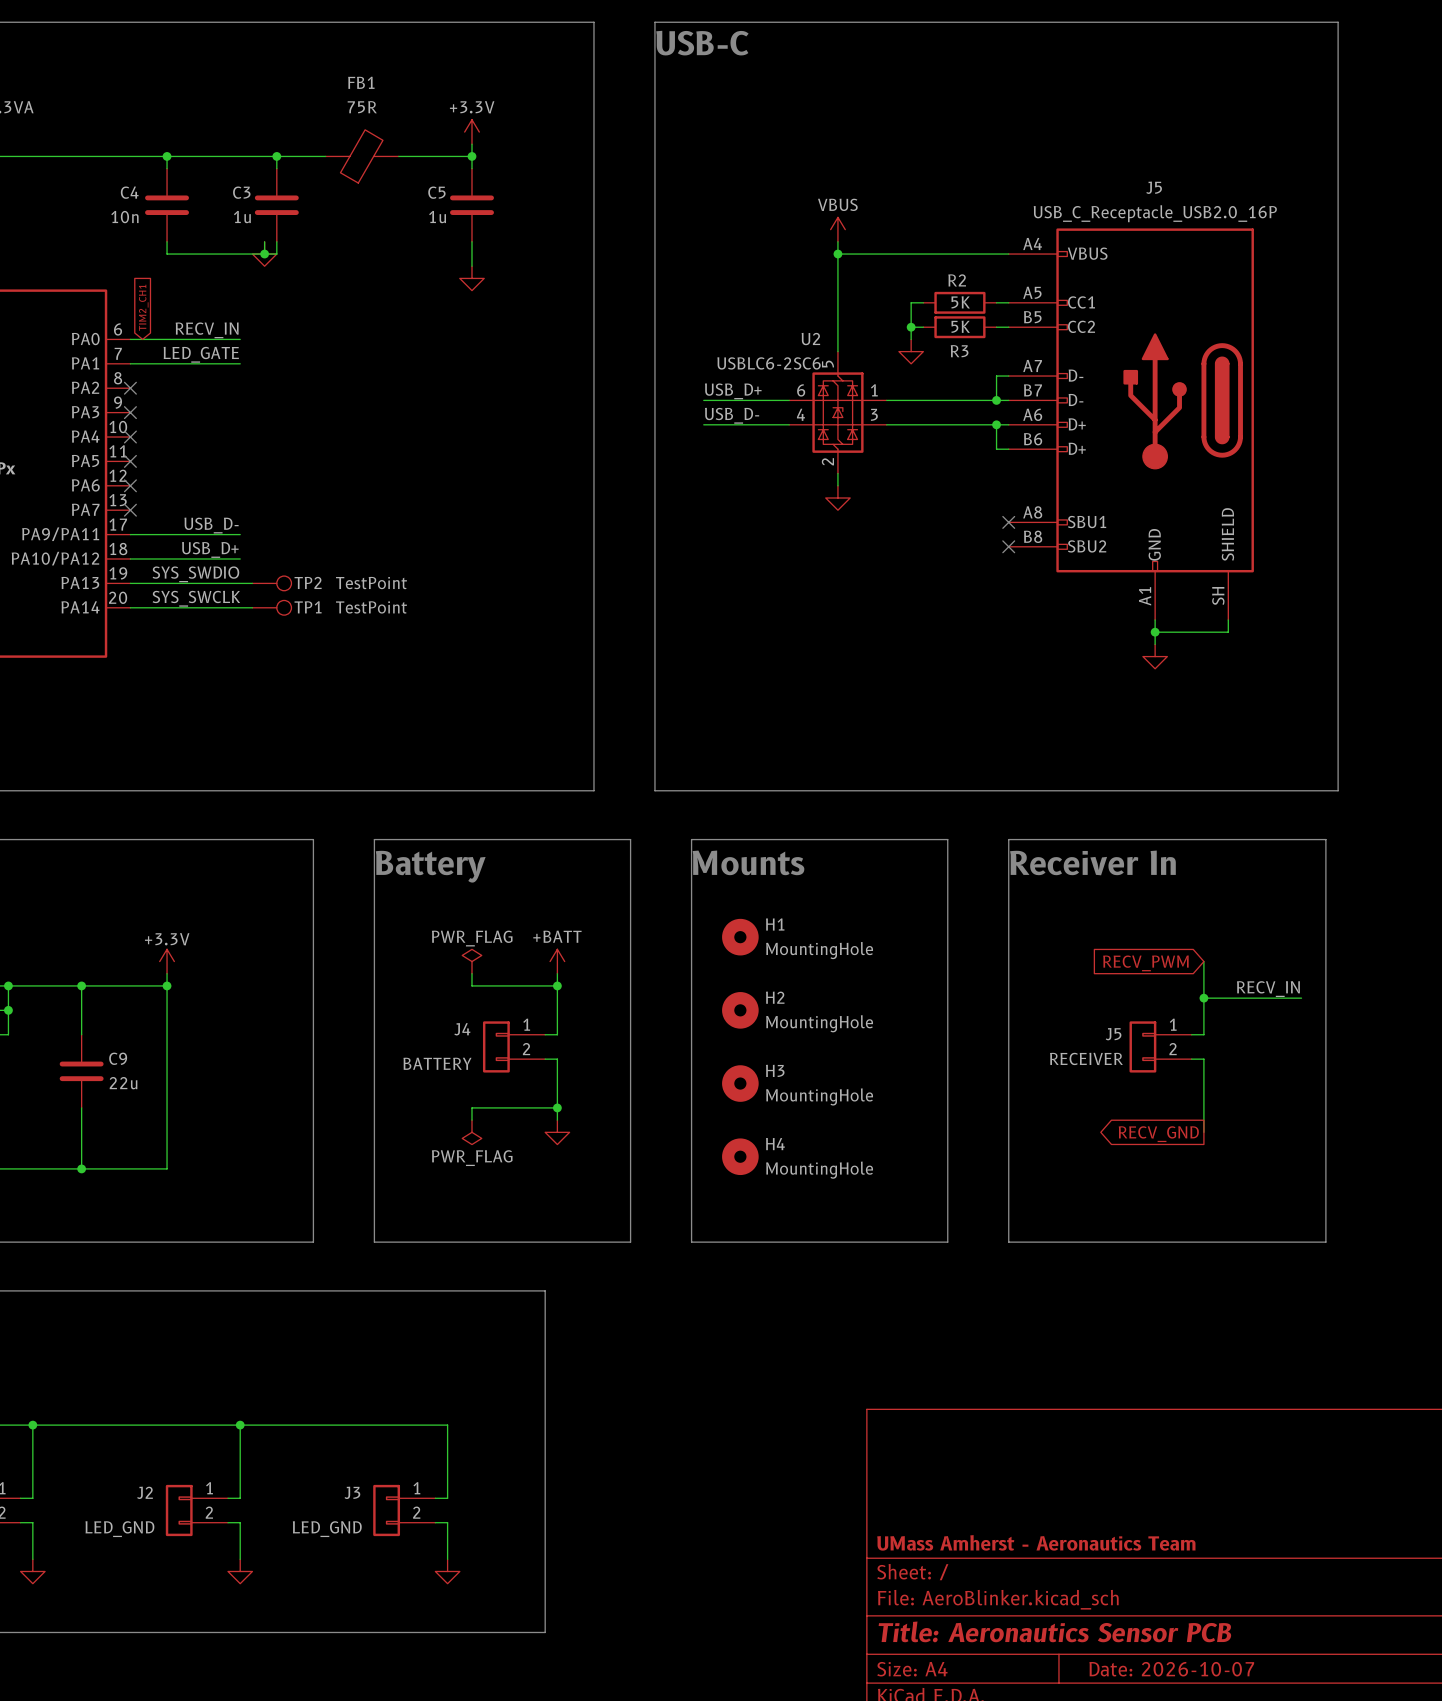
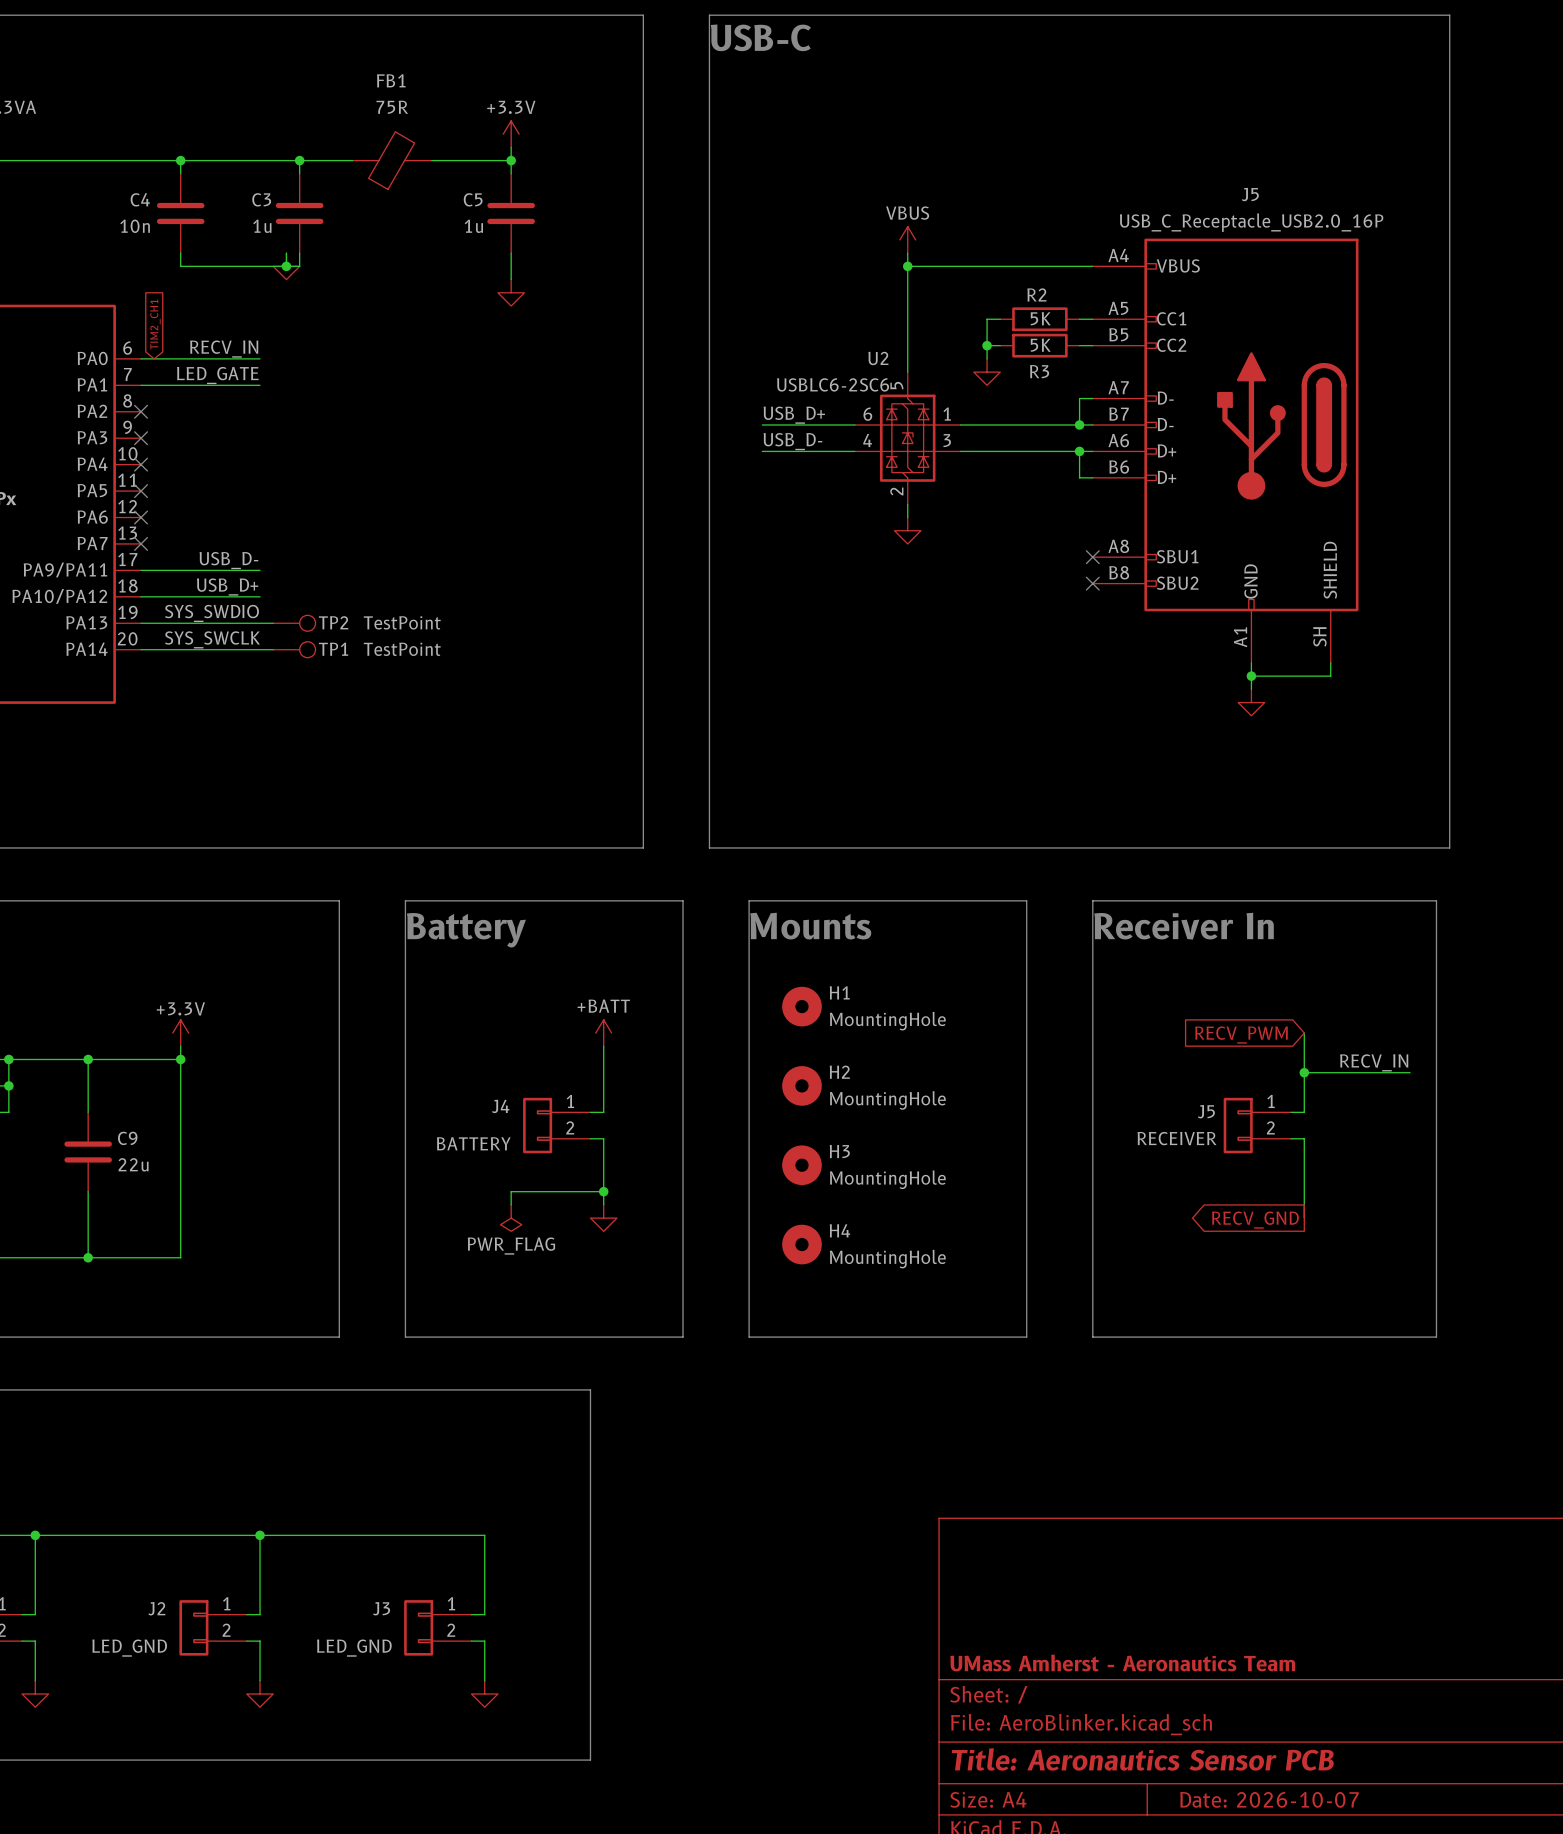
power symbol: PWR_FLAG (471, 961) -> none
wire: (471, 973) (471, 985) (557, 985) -> none
junction: (557, 985) -> none

